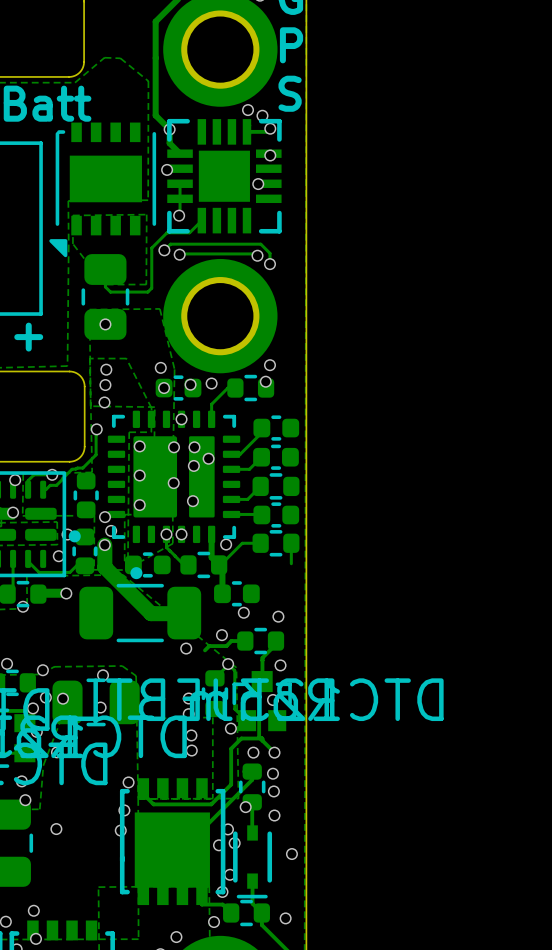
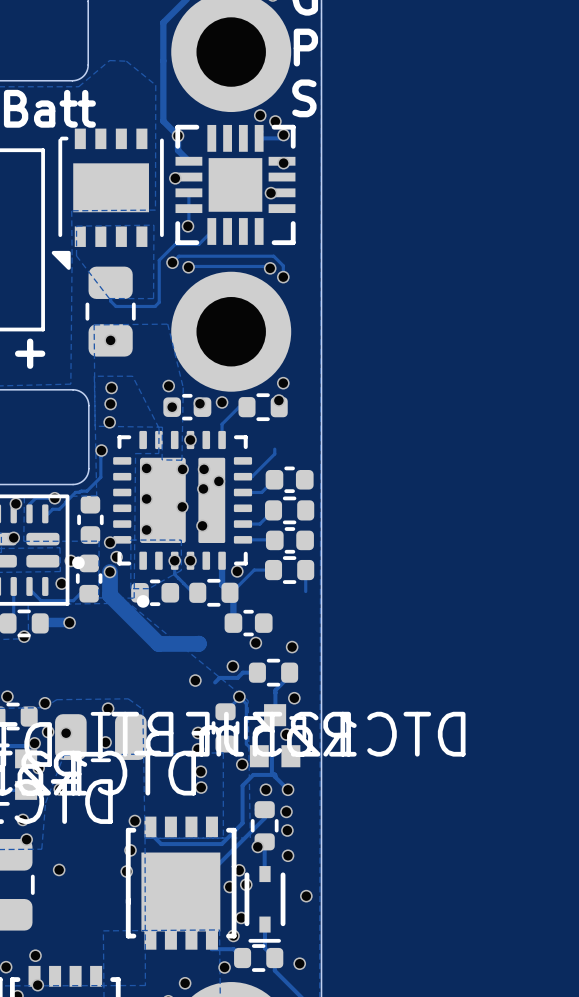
part: (276, 428) -> none
part: (140, 613) -> none

